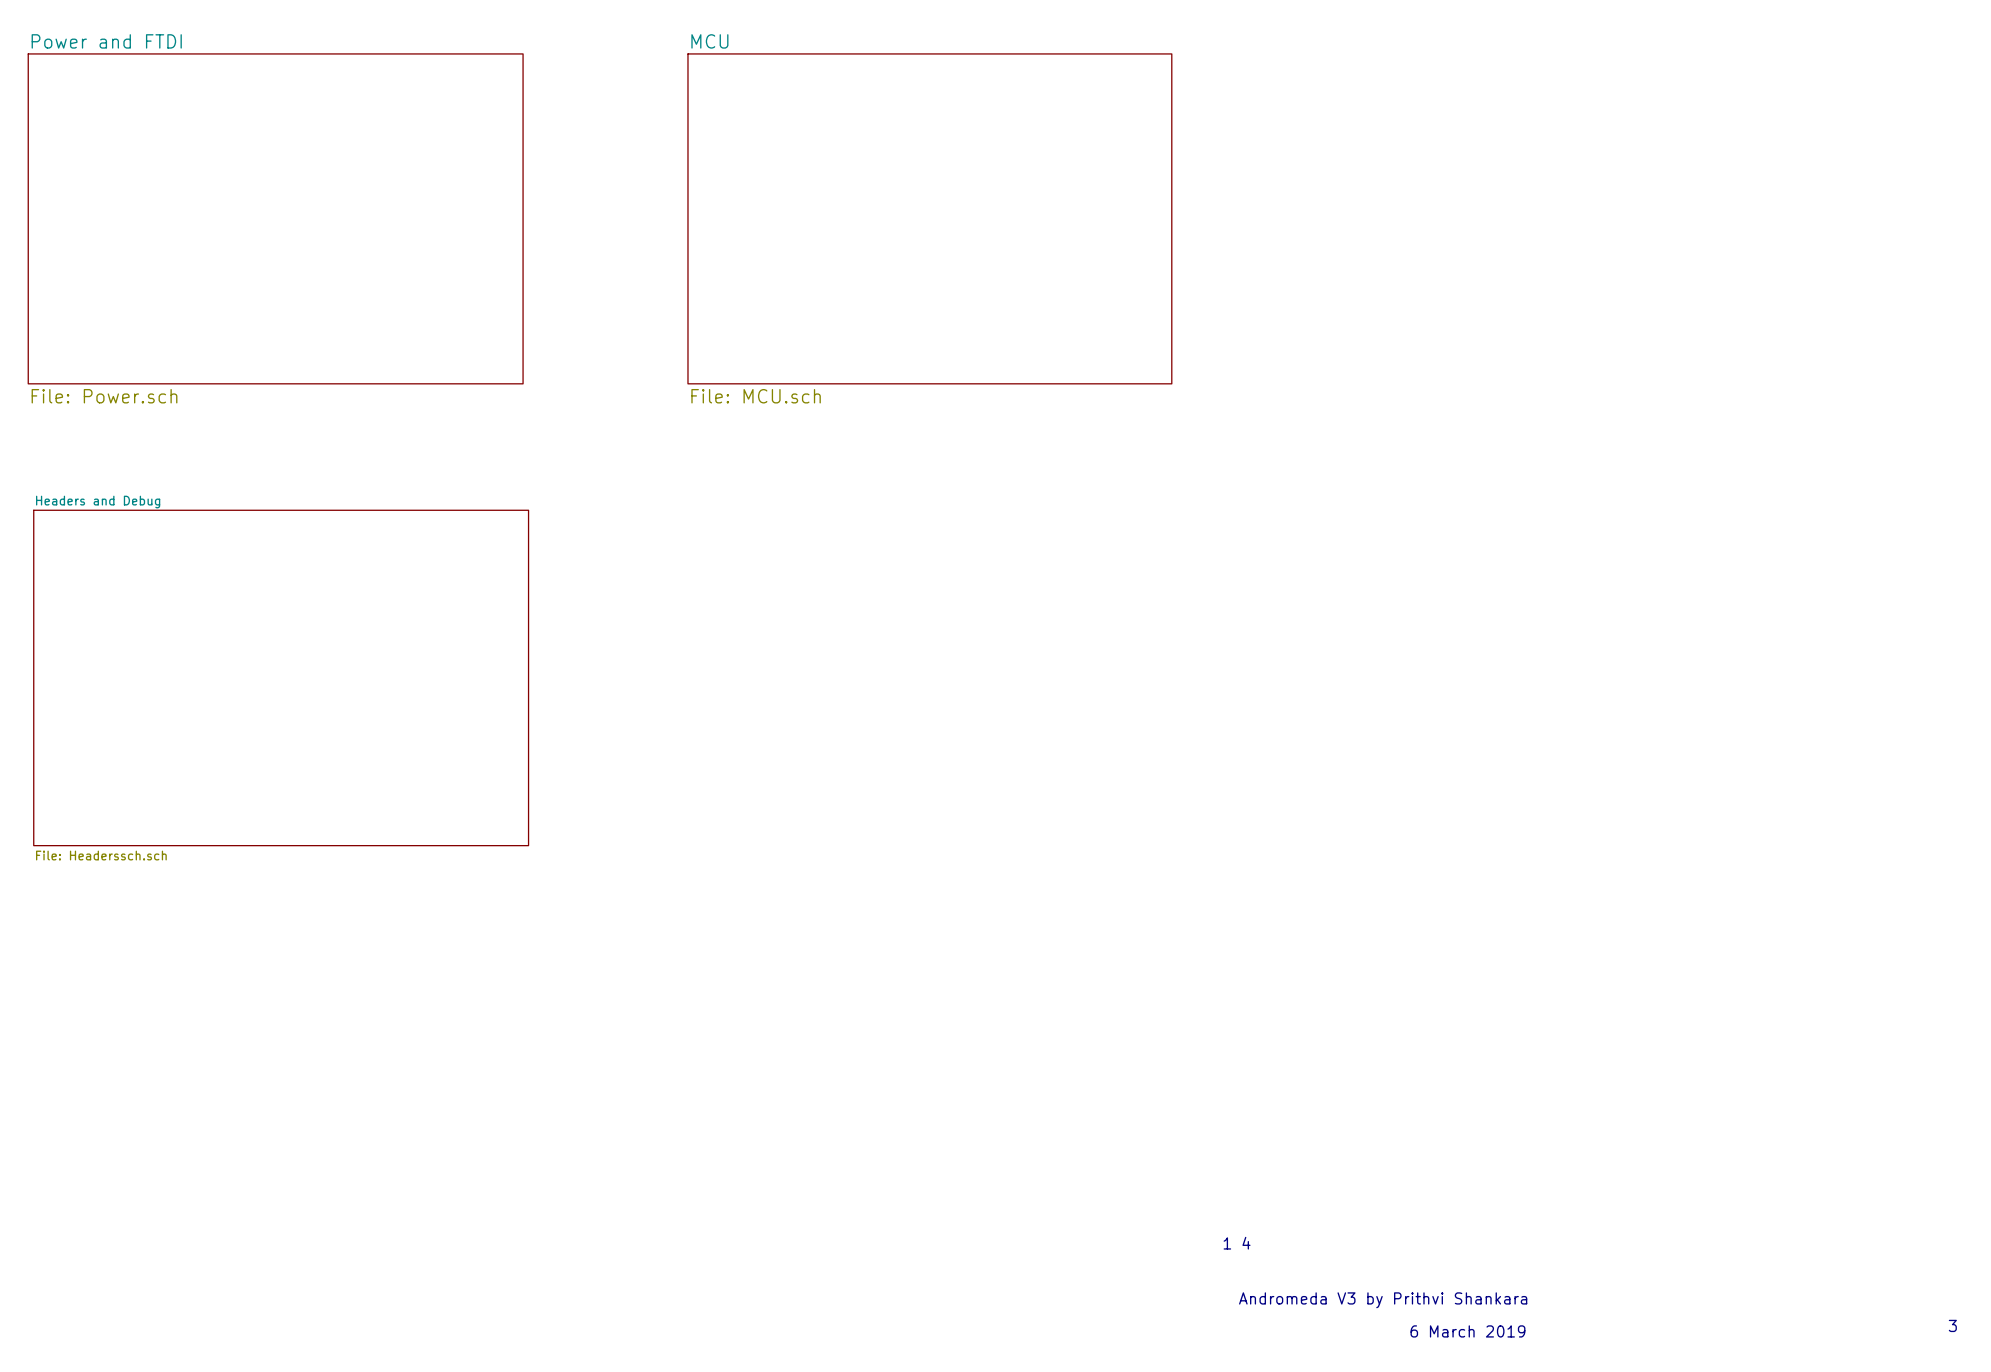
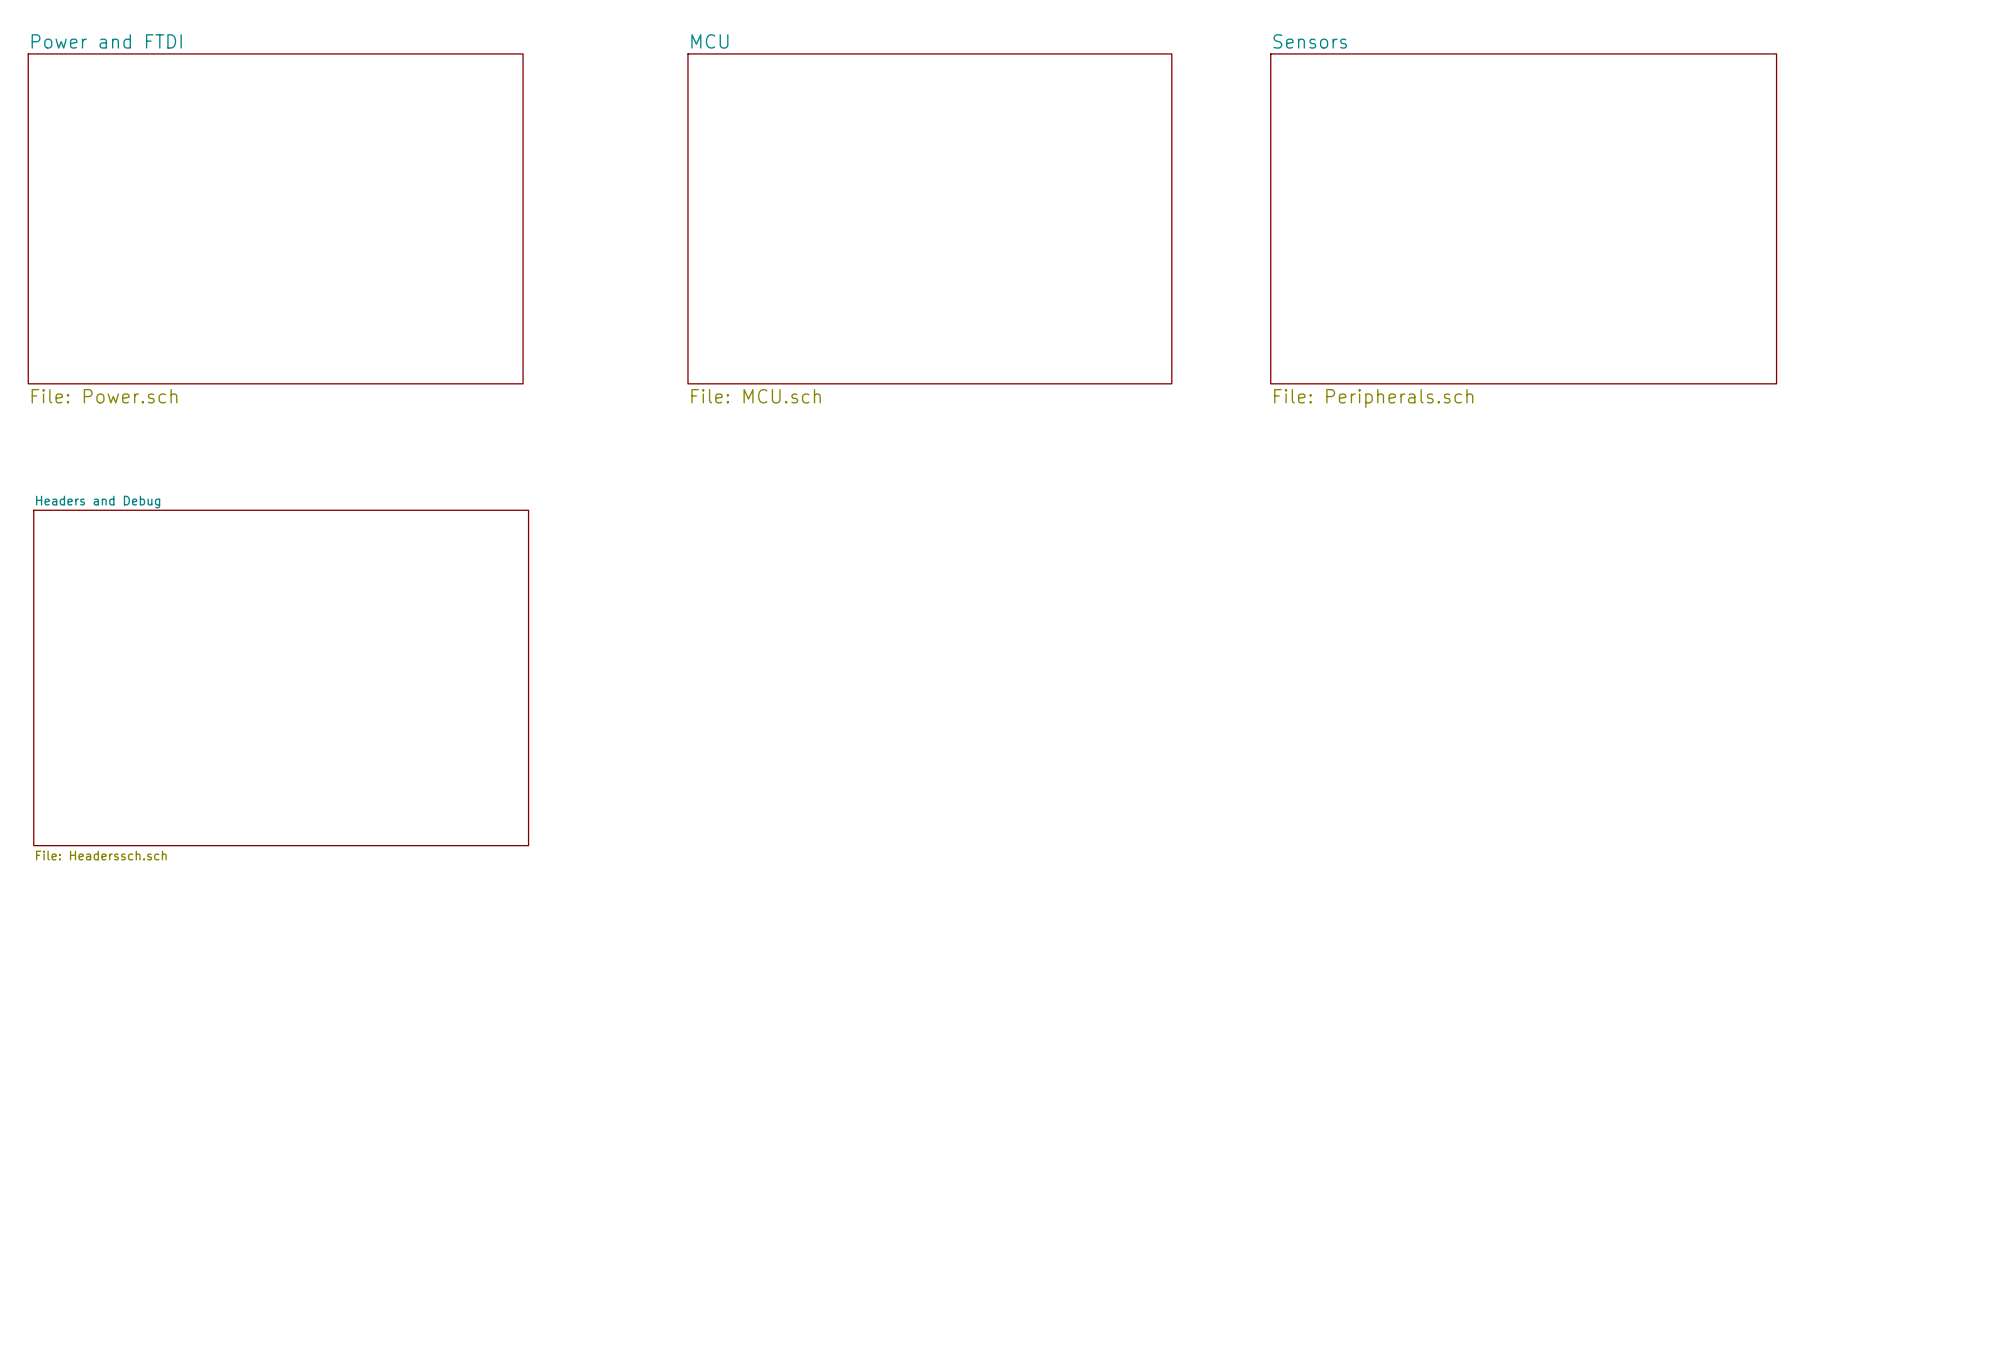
sheet Sensors: none -> File: Peripherals.sch (1523, 218)
text: 1 4 (1237, 1243) -> none
text: Andromeda V3 by Prithvi Shankara (1383, 1300) -> none
text: 3 (1952, 1325) -> none
text: 6 March 2019 (1467, 1331) -> none

